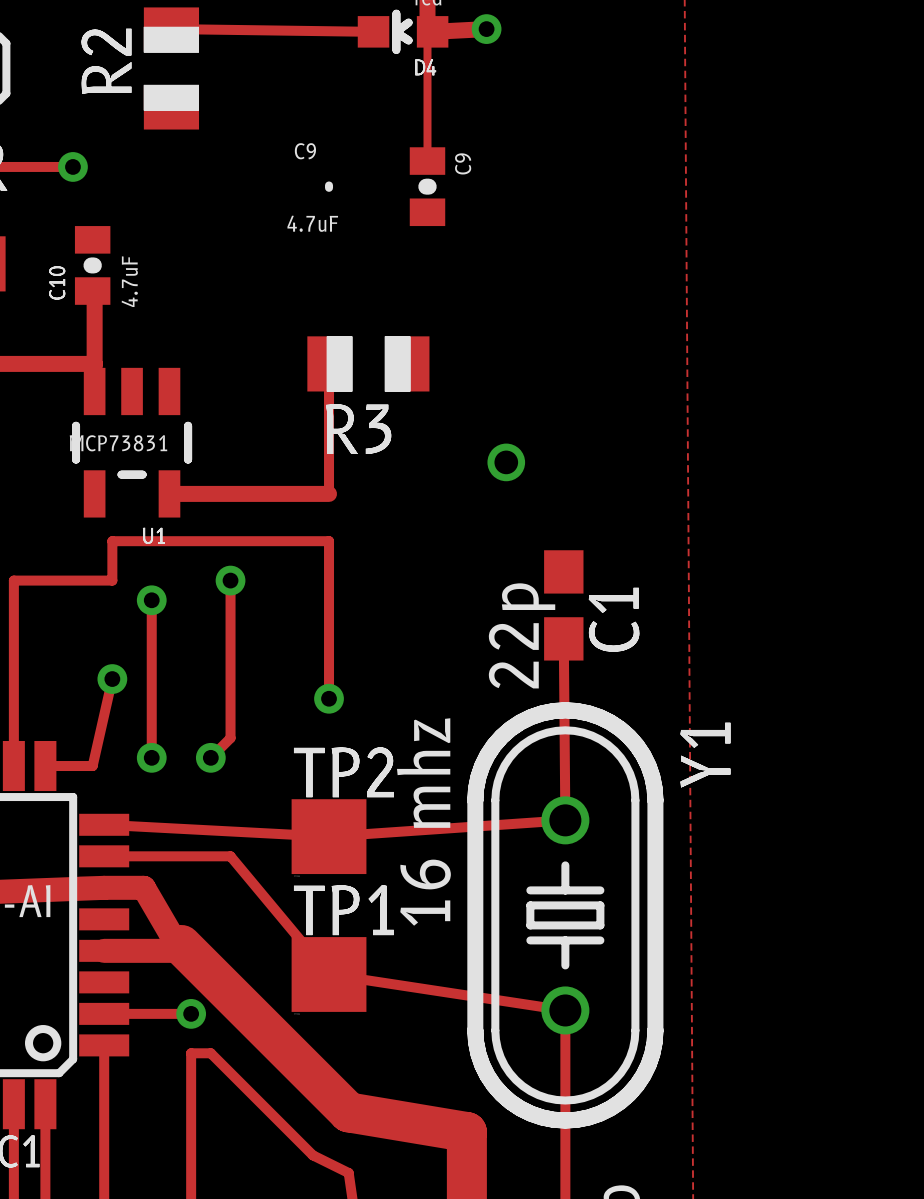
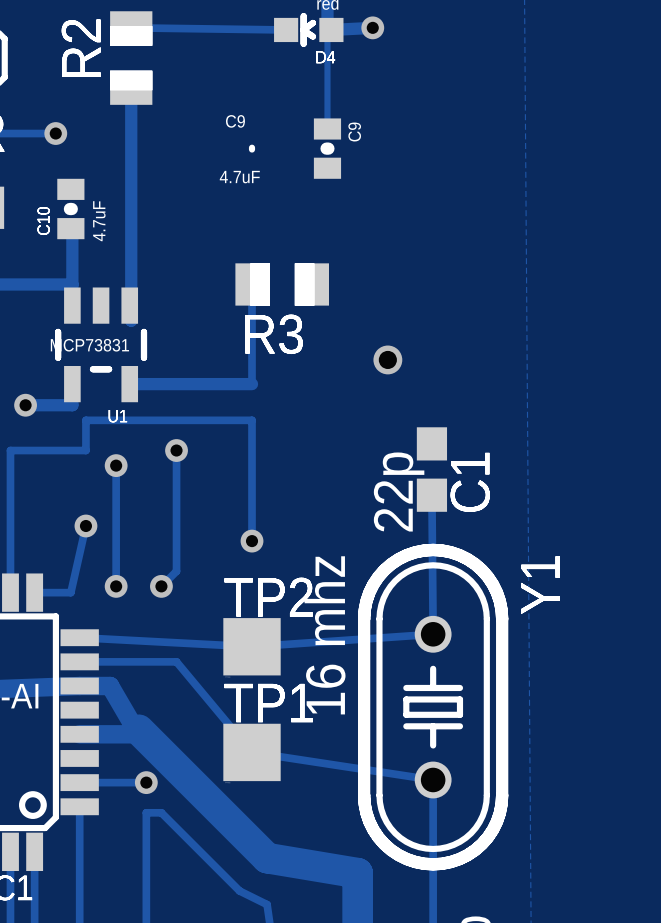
track: none -> (131, 88) (131, 320) (129, 305)
track: none -> (72, 384) (72, 405) (25, 405)
via: none -> (25, 405)

